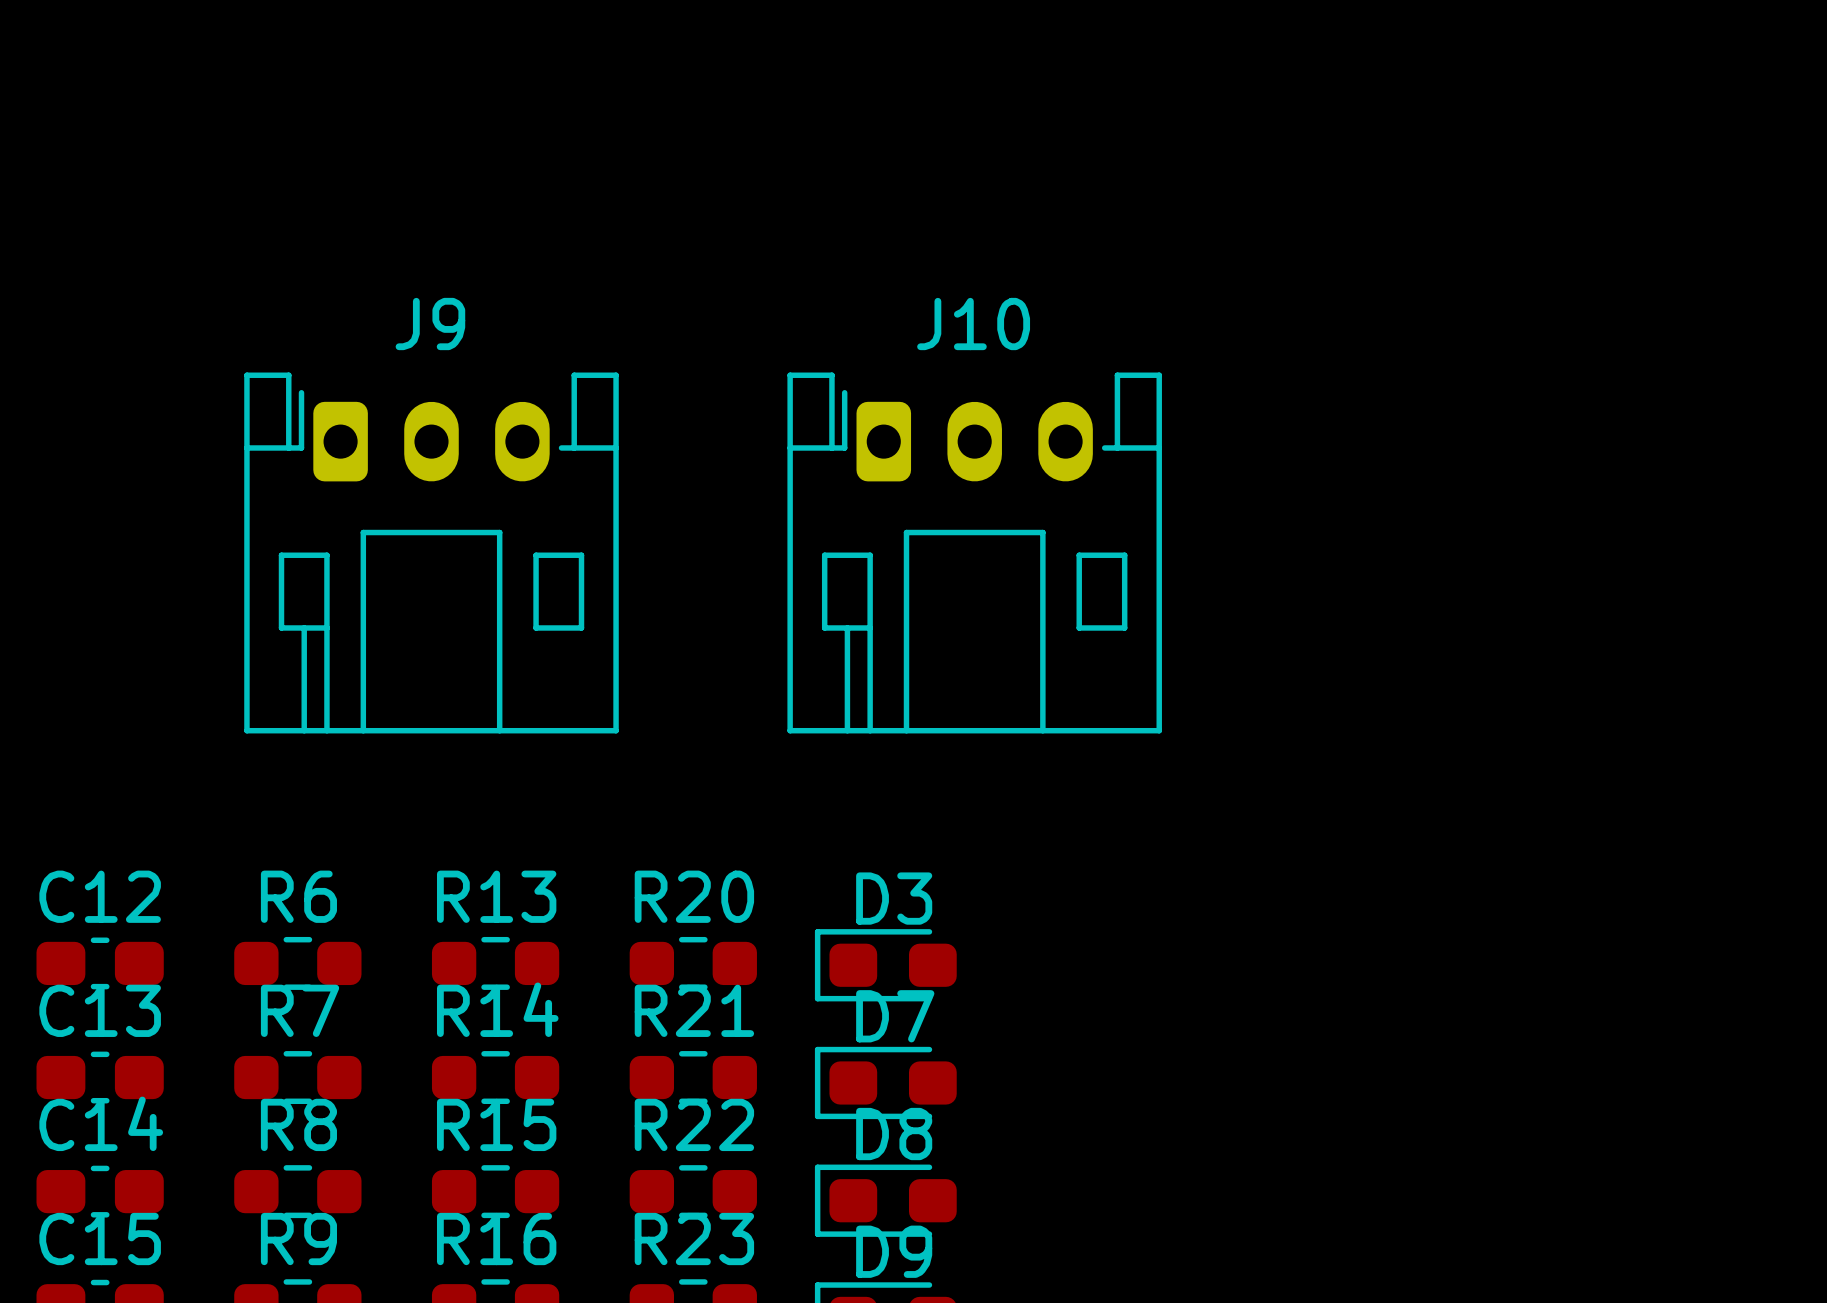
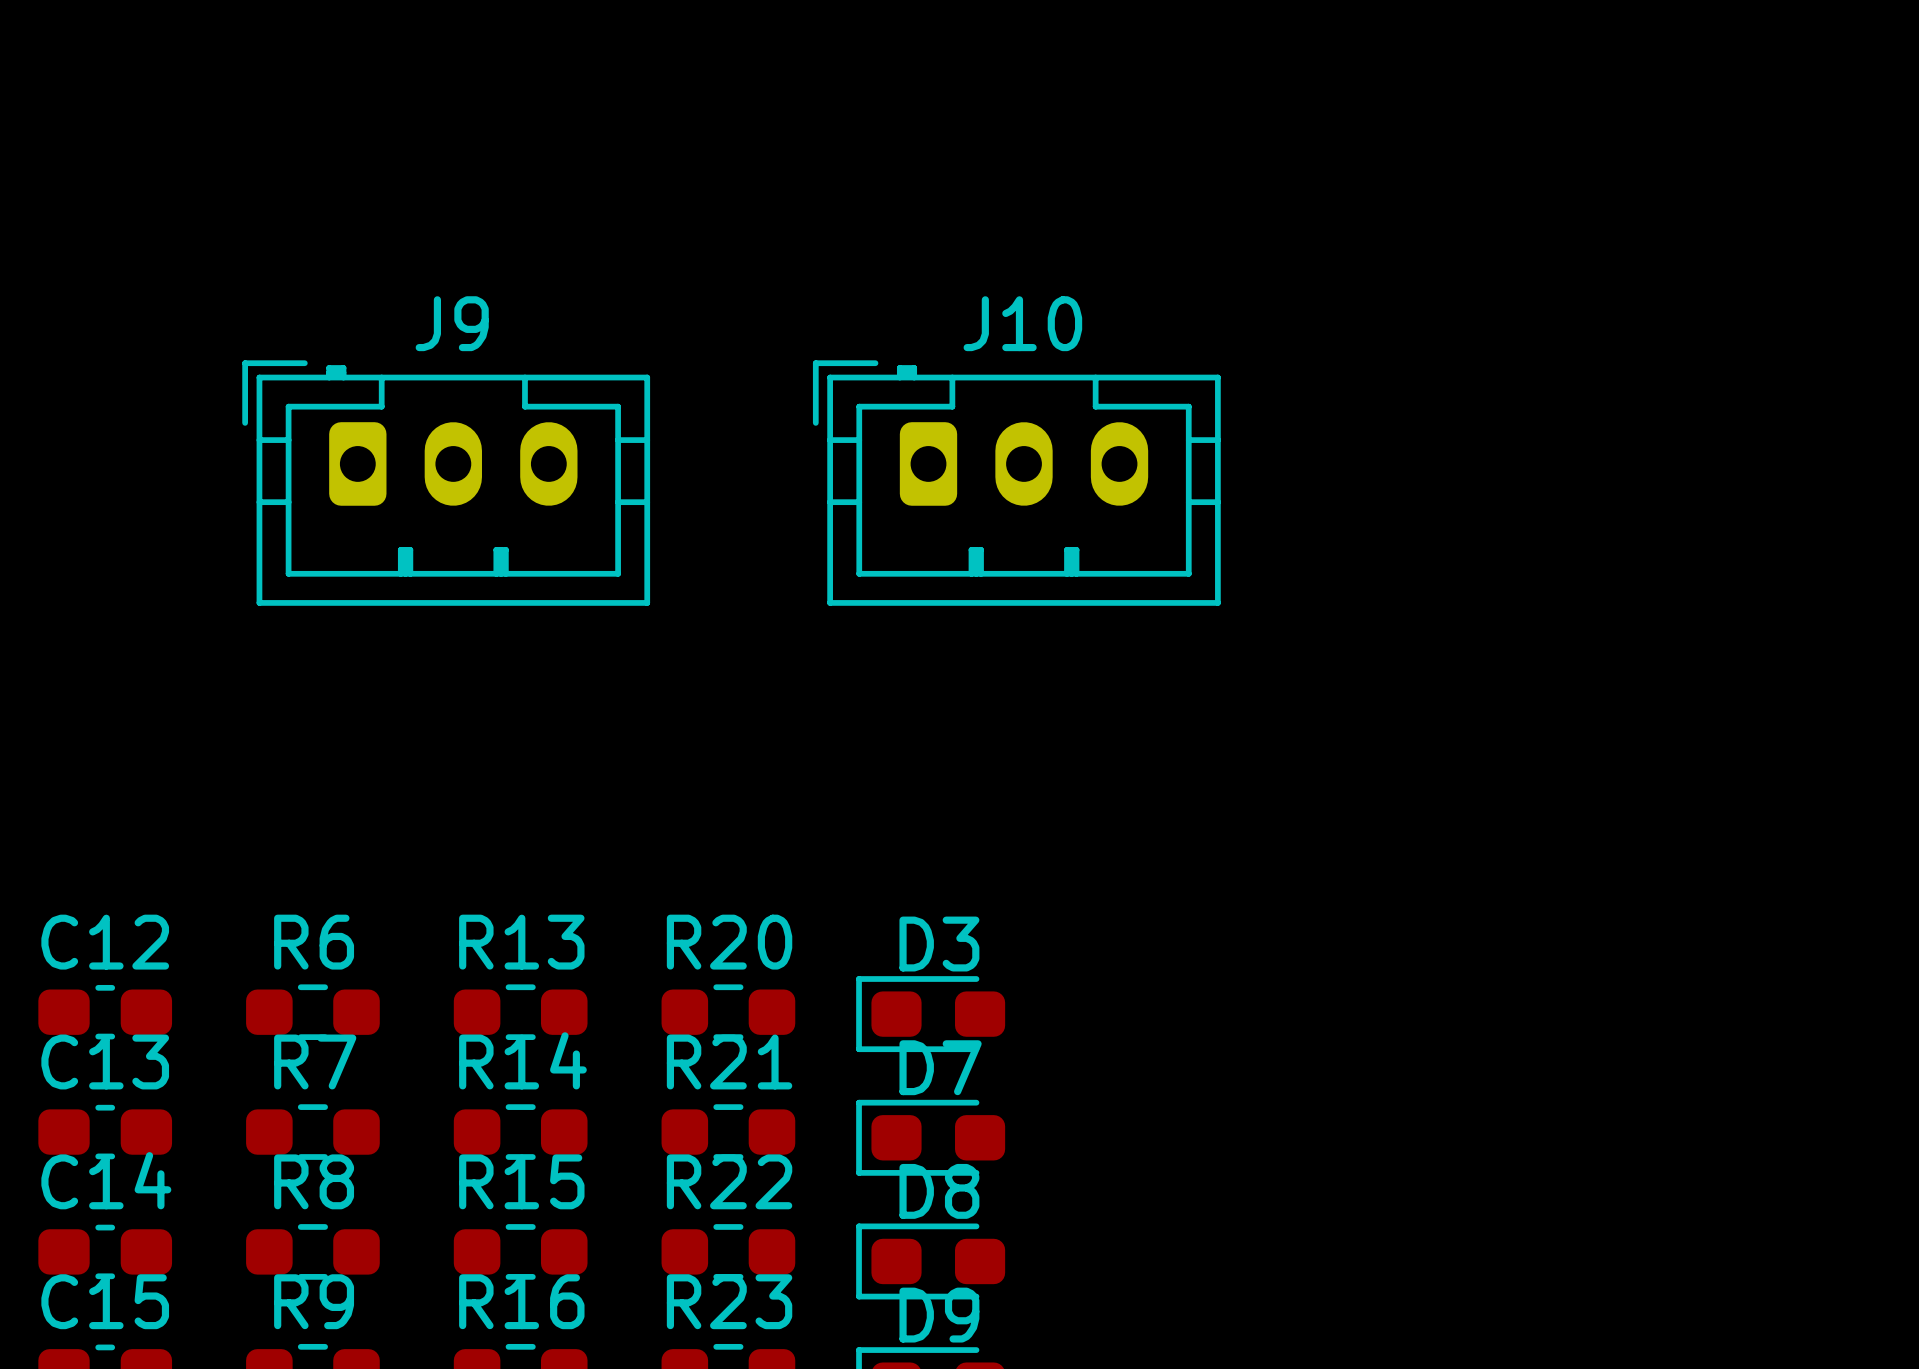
J9 footprint: [244, 372, 619, 734] -> [242, 360, 651, 606]
J10 footprint: [787, 372, 1162, 734] -> [812, 360, 1221, 606]

